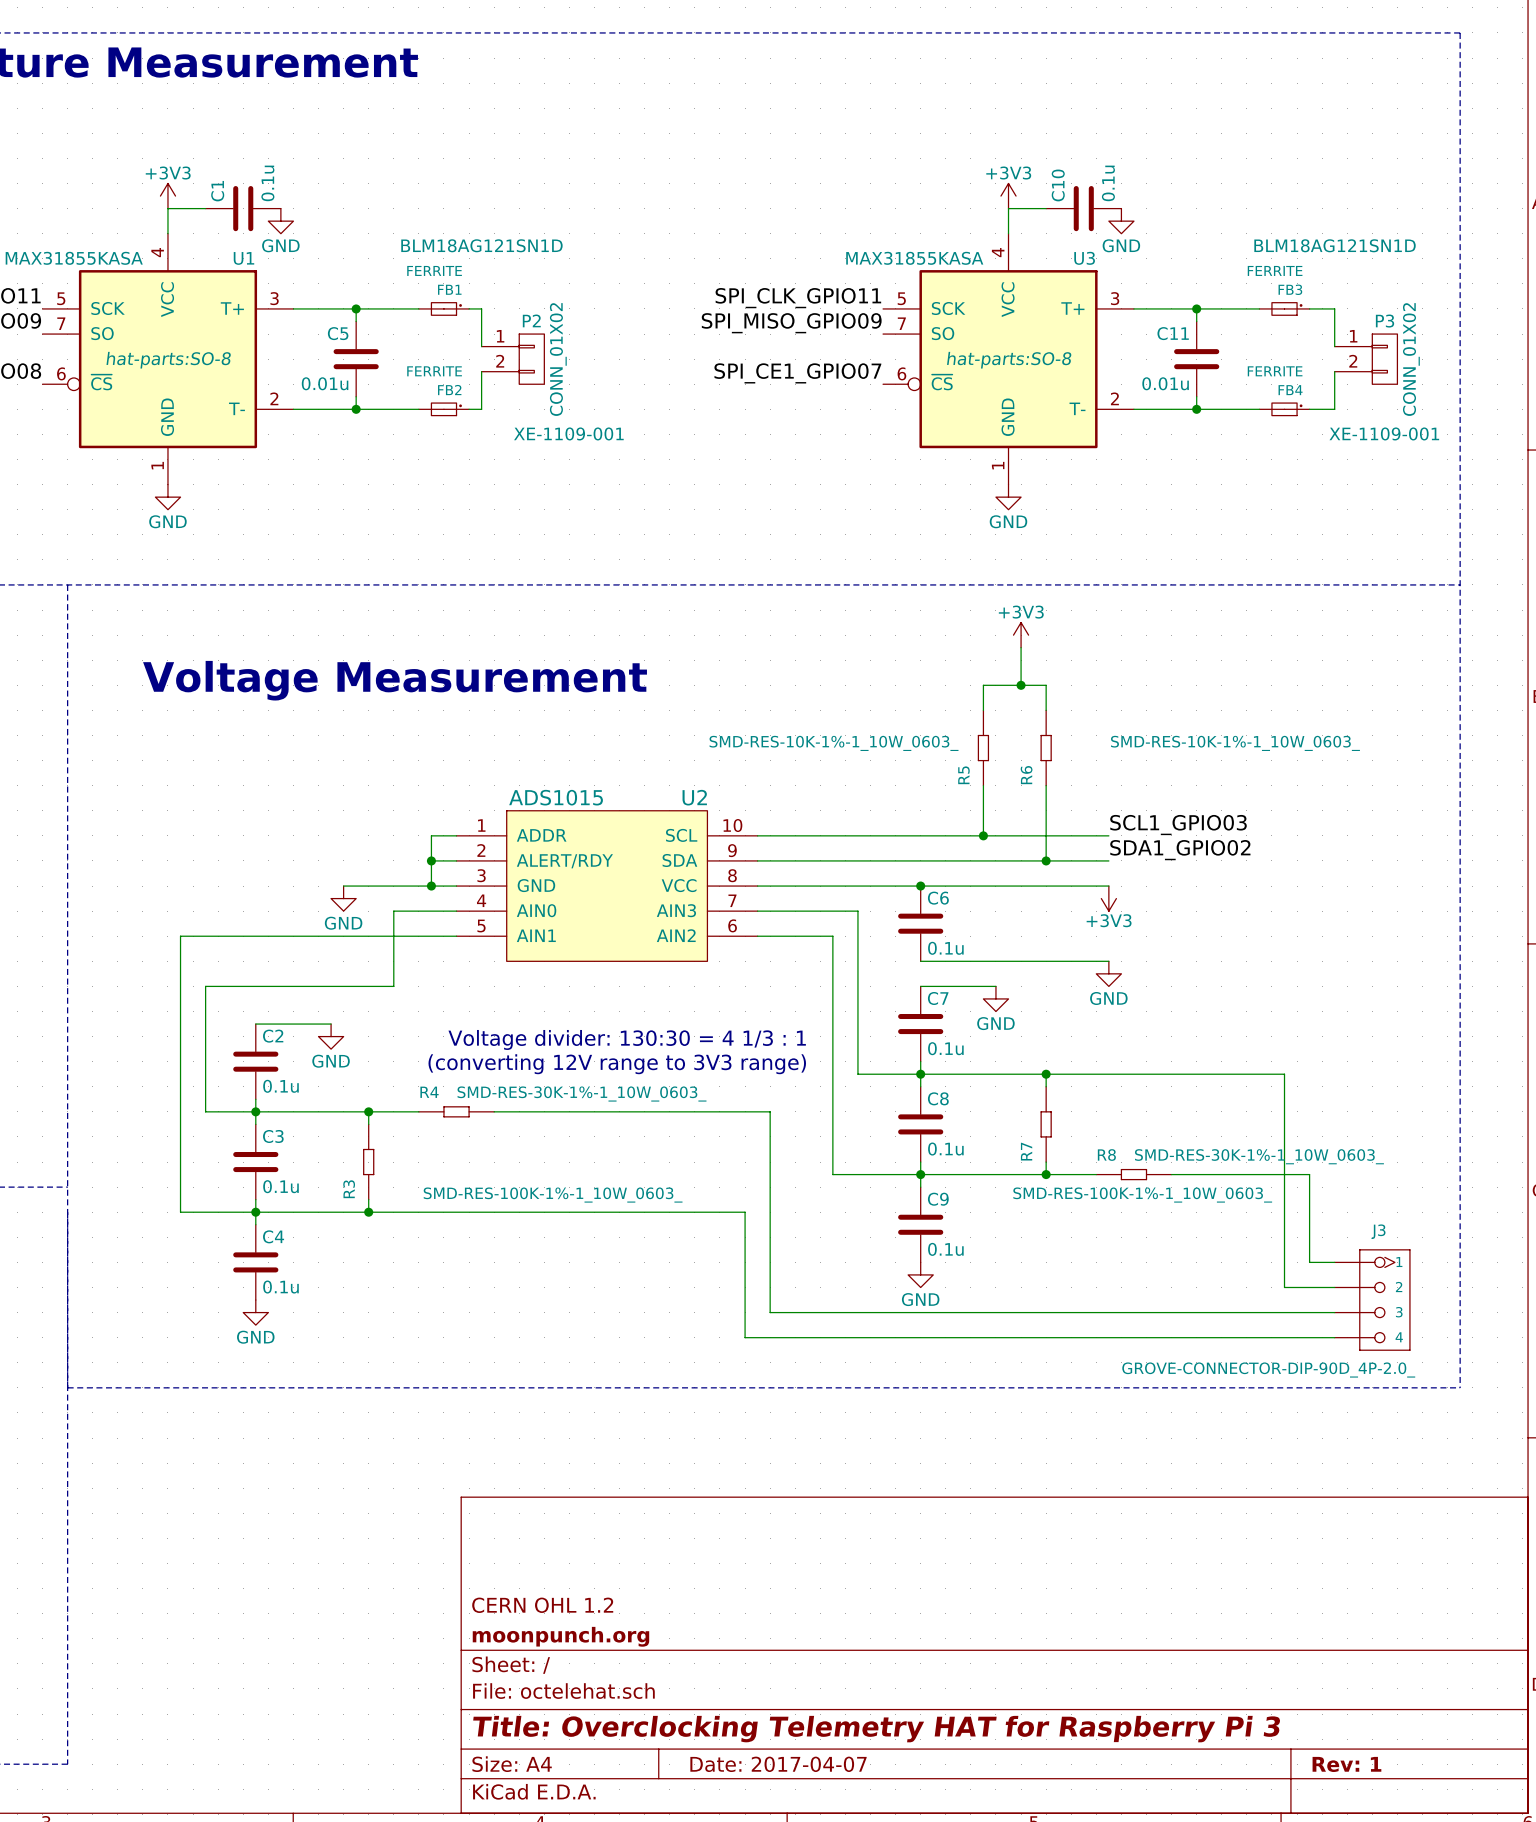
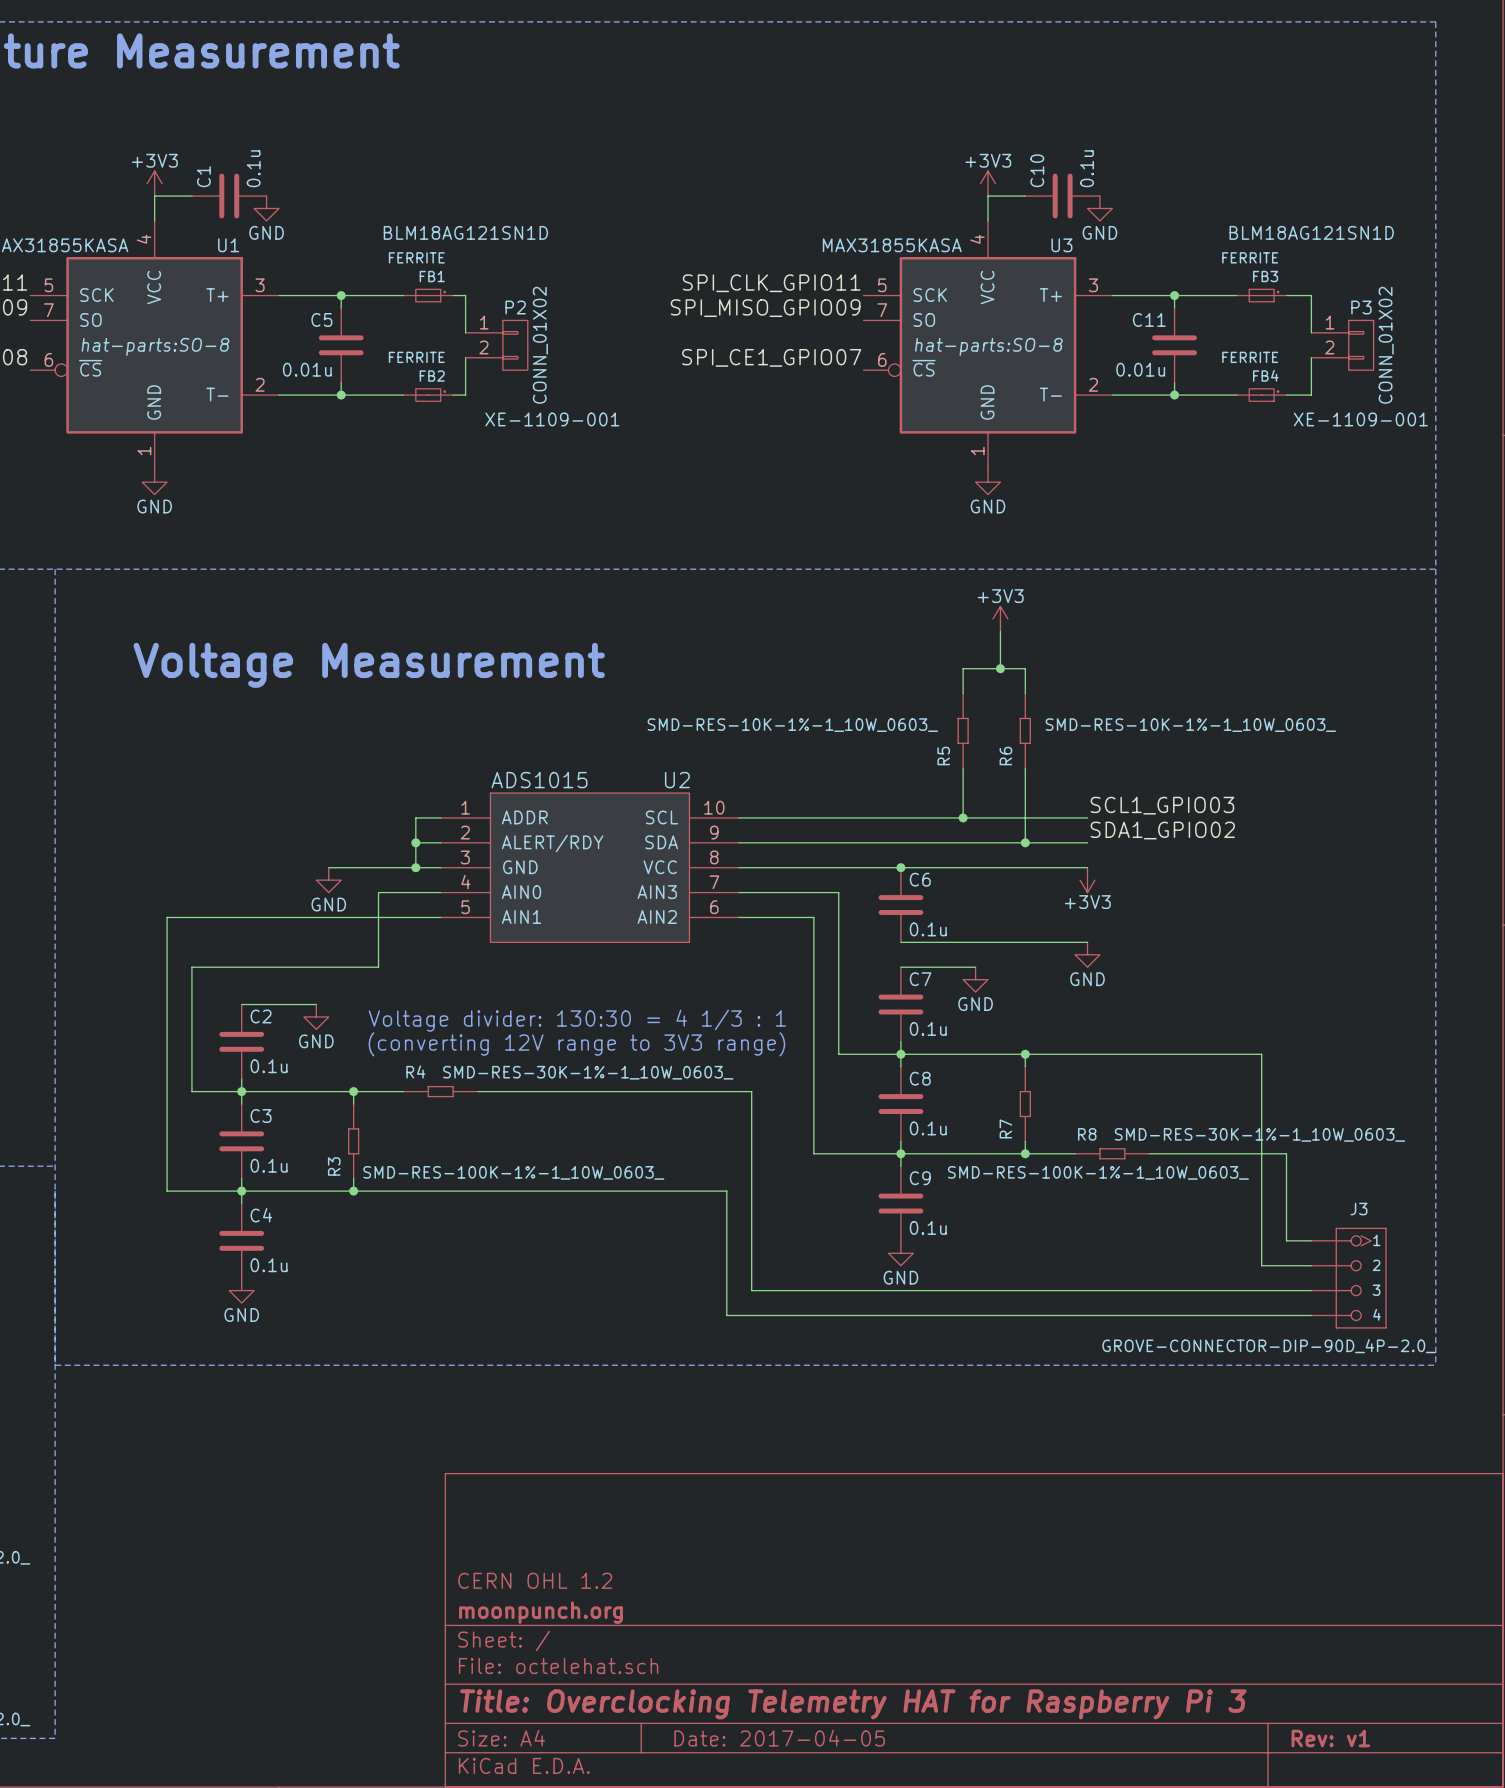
title block: Date: 2017-04-07 (778, 1764) -> Date: 2017-04-05 (779, 1738)
title block: Rev: 1 (1346, 1764) -> Rev: v1 (1330, 1738)

